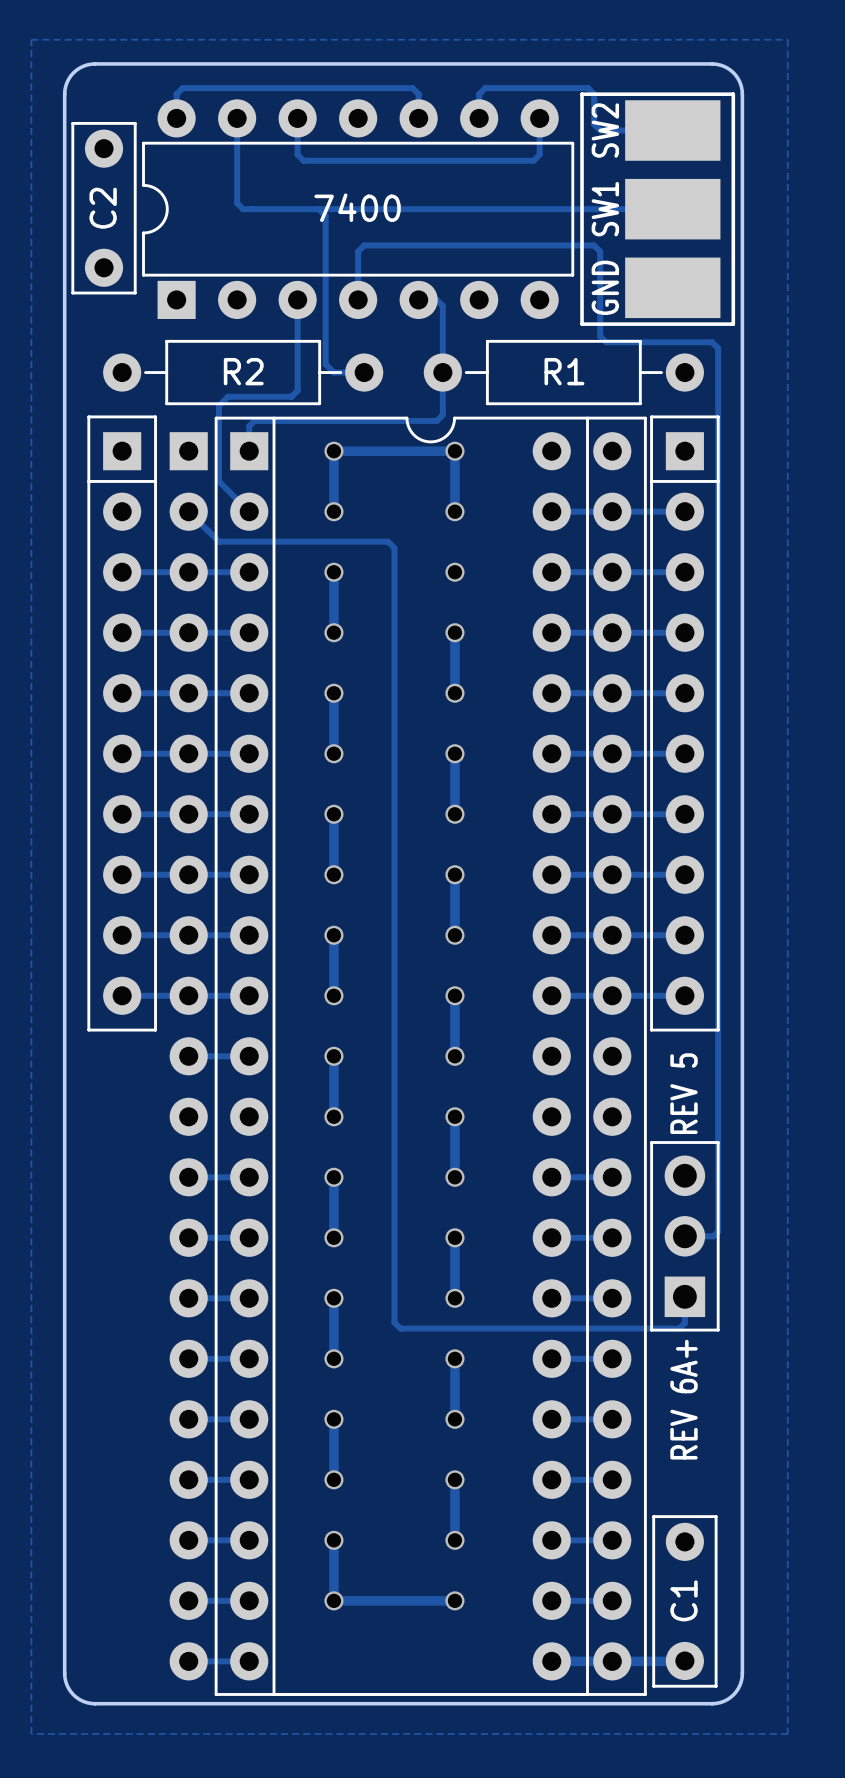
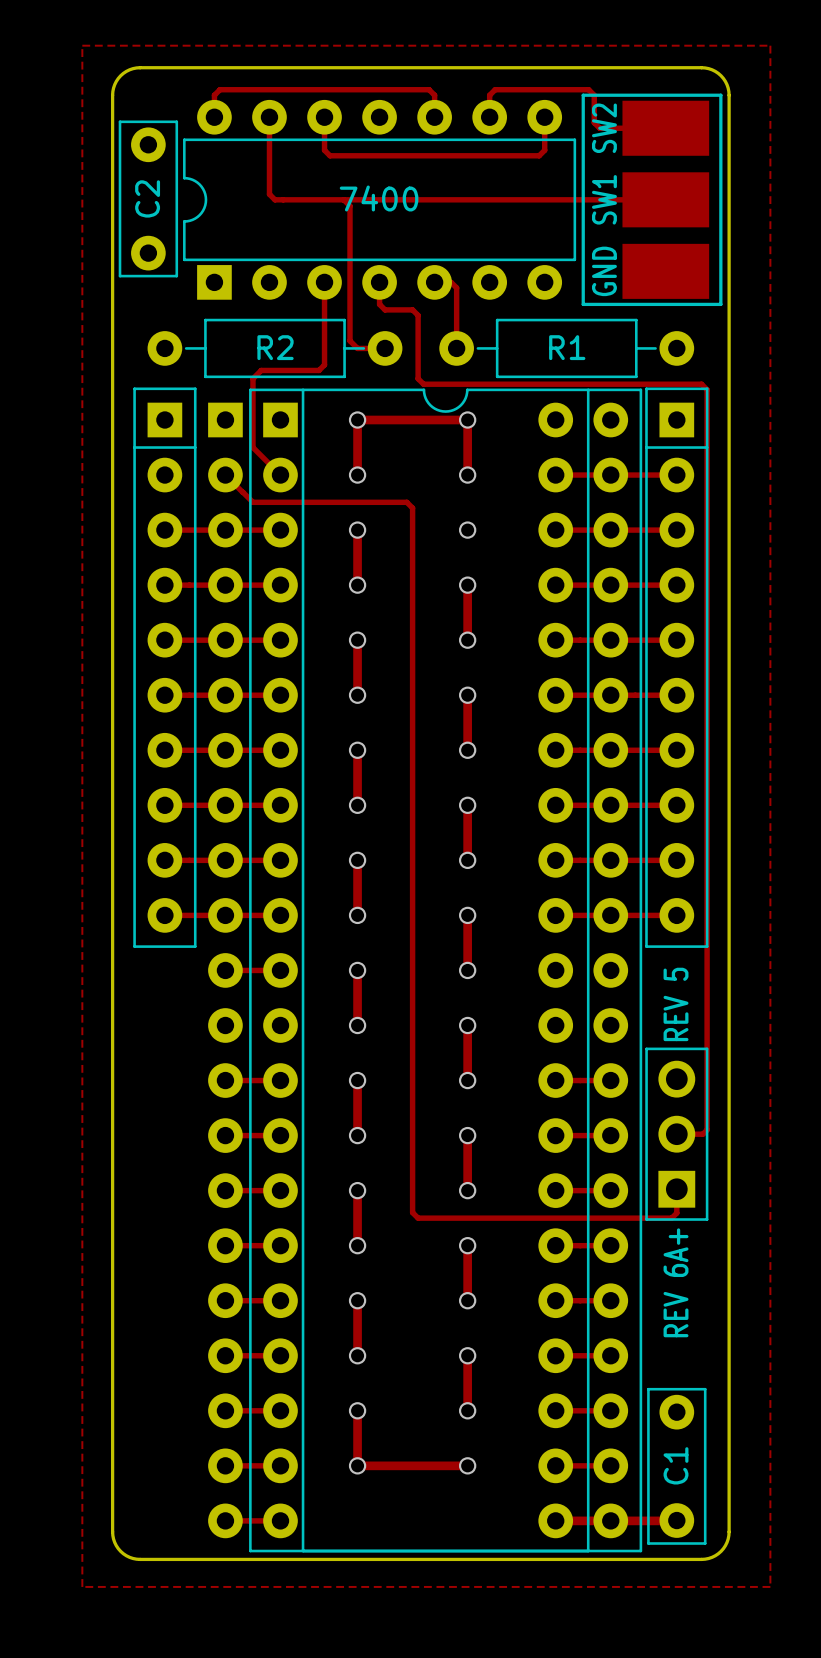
track: (358, 299) (358, 251) (364, 245) (594, 245) (600, 251) (600, 336) (606, 342) (712, 342) (718, 348) (718, 417) -> (379, 282) (379, 304) (385, 309) (412, 309) (418, 315) (418, 378) (423, 384) (701, 384) (707, 389)
track: (442, 372) (442, 414) (436, 420) (254, 420) (249, 426) (249, 451) -> none

